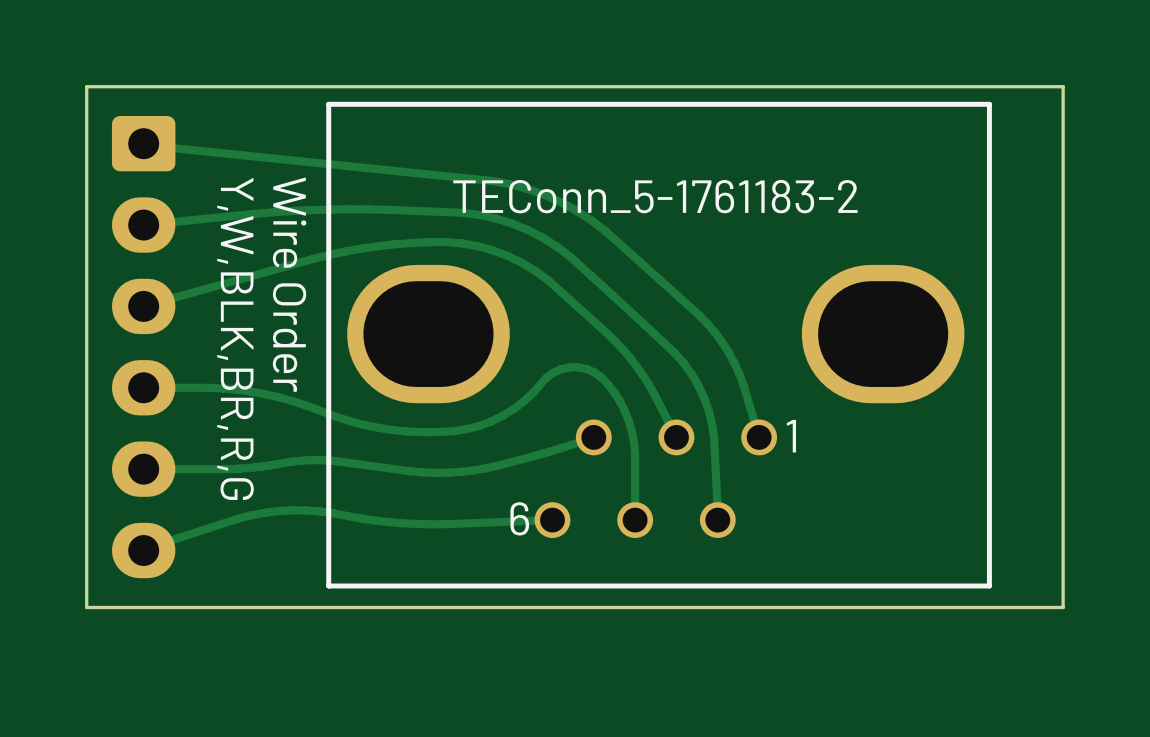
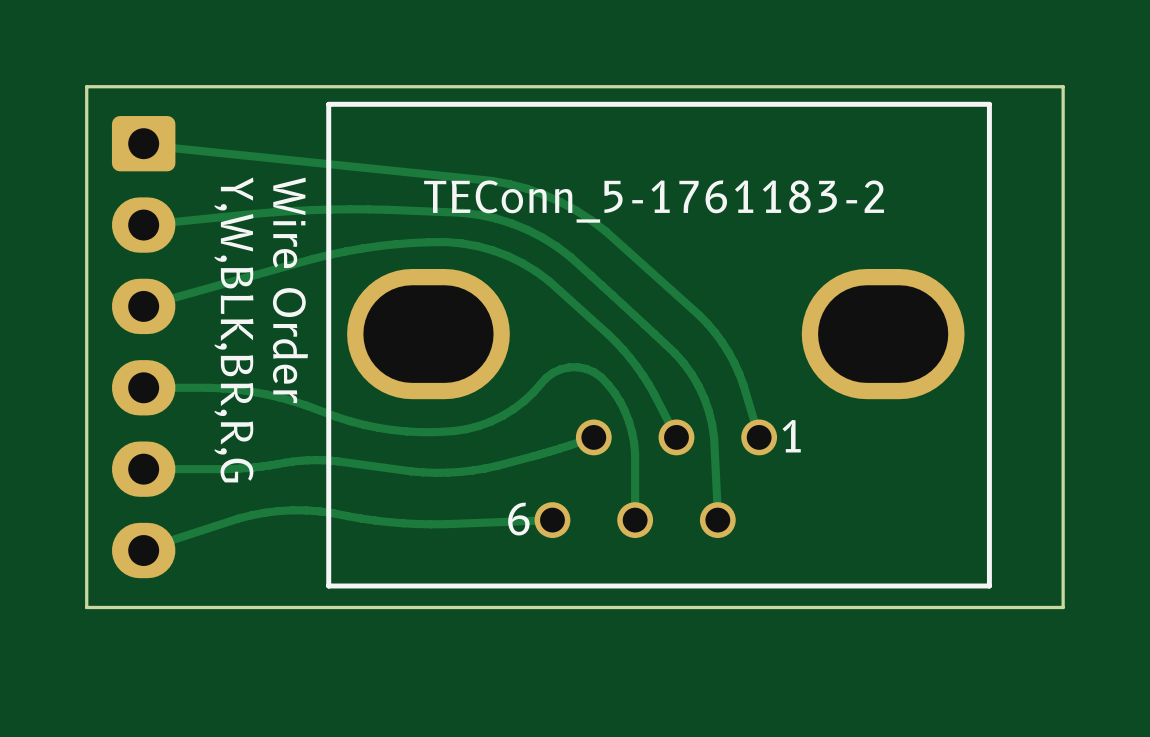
part footprint: [326, 101, 992, 589] -> [326, 101, 992, 589]

